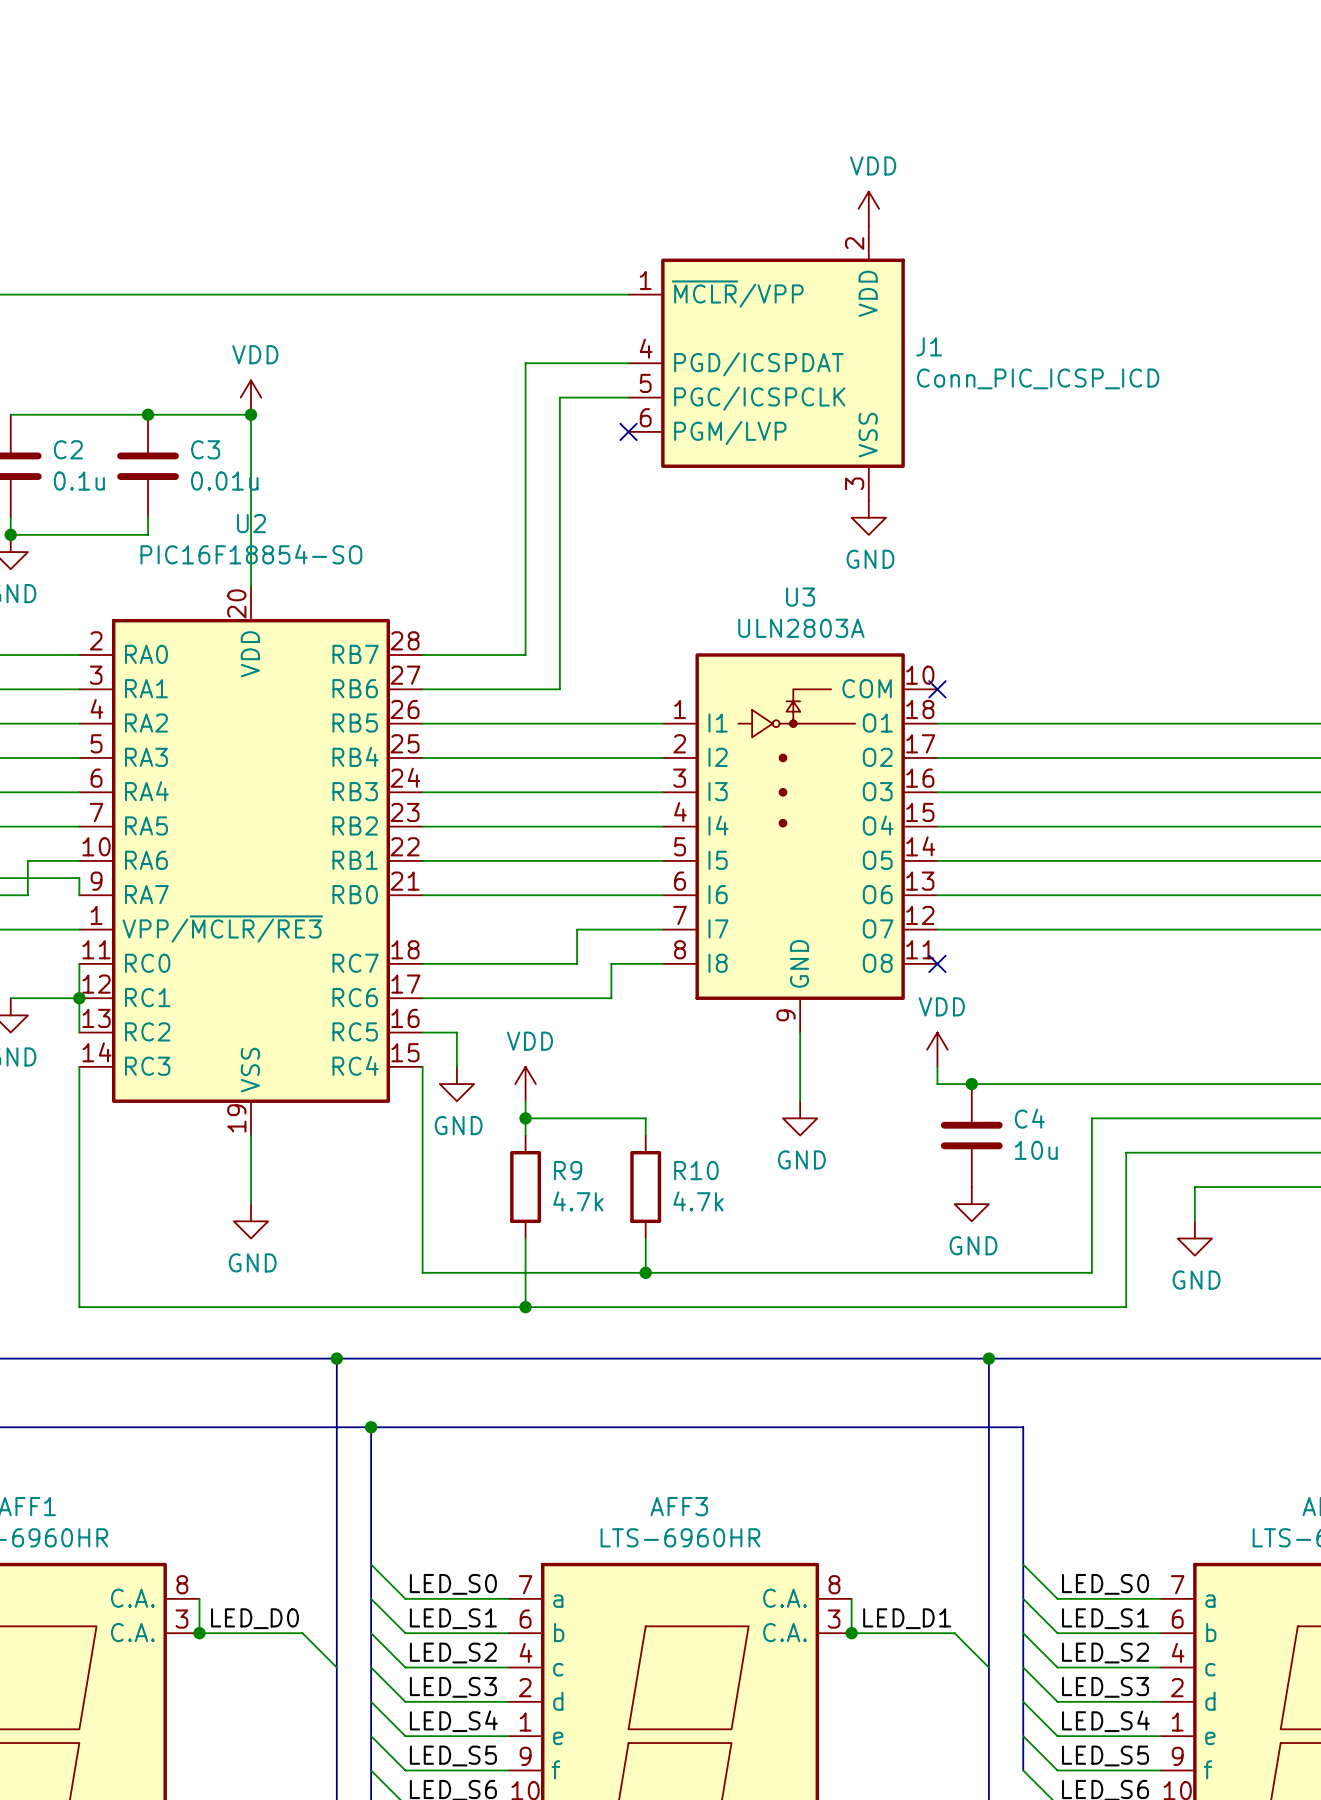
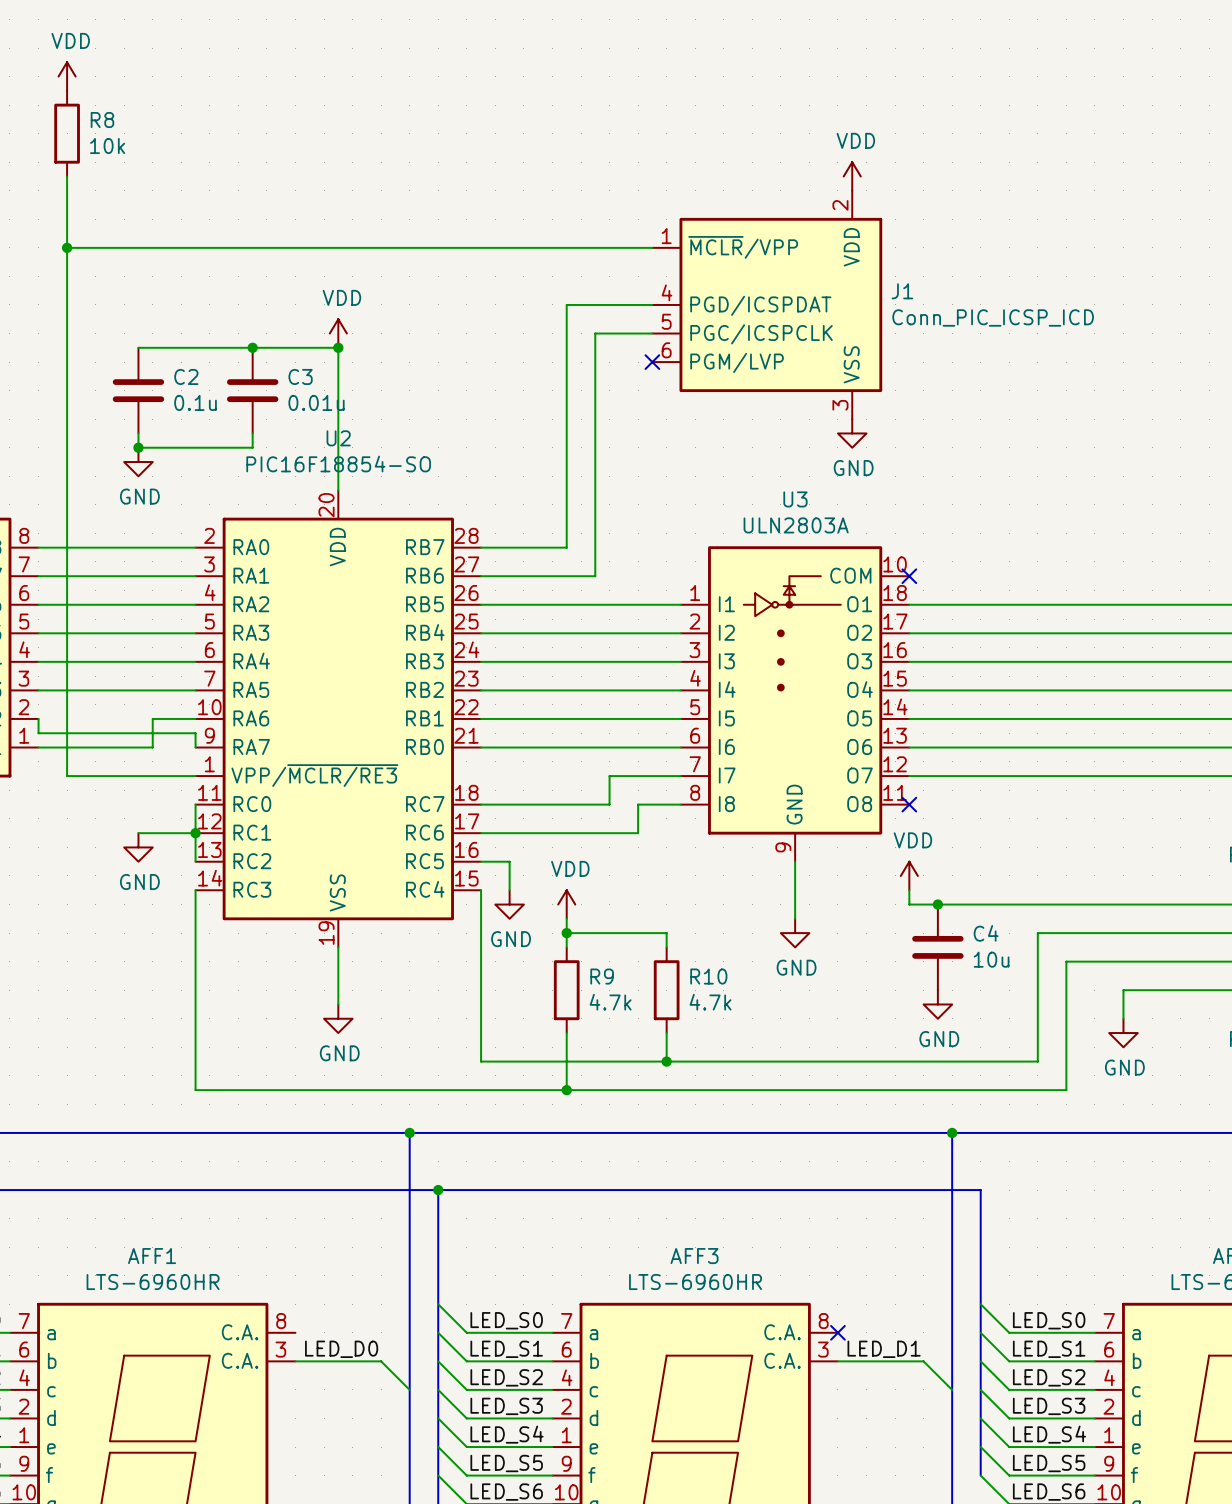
wire: (199, 1598) (199, 1633) -> none
wire: (851, 1598) (851, 1633) -> none
no-connect mark: none -> (837, 1332)
junction: (199, 1633) -> none
junction: (851, 1633) -> none

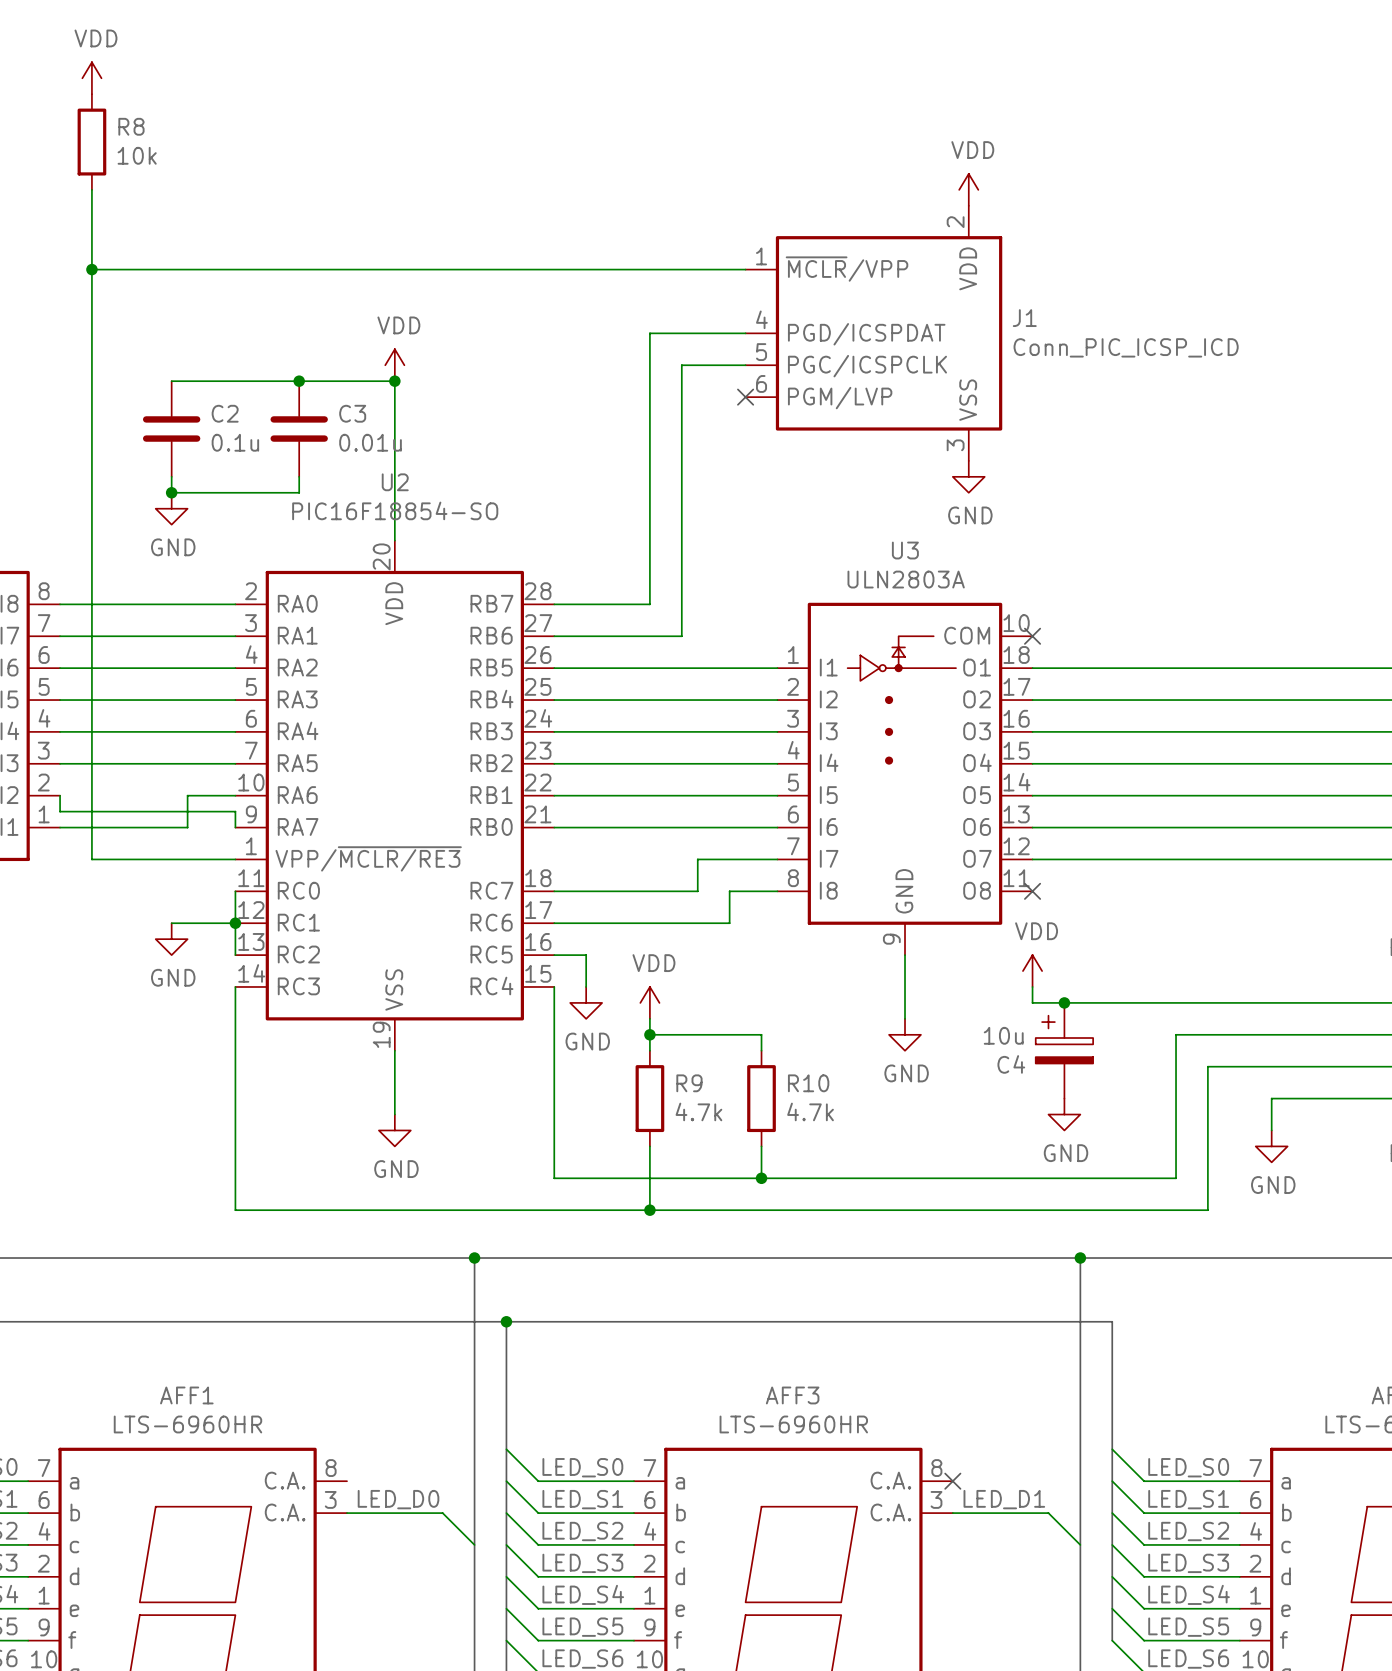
C4 symbol: [912, 904, 964, 991] -> [1035, 1002, 1094, 1099]
C4 name position: C4 (986, 933) -> C4 (1011, 1064)
C4 value position: 10u (991, 959) -> 10u (1003, 1035)

